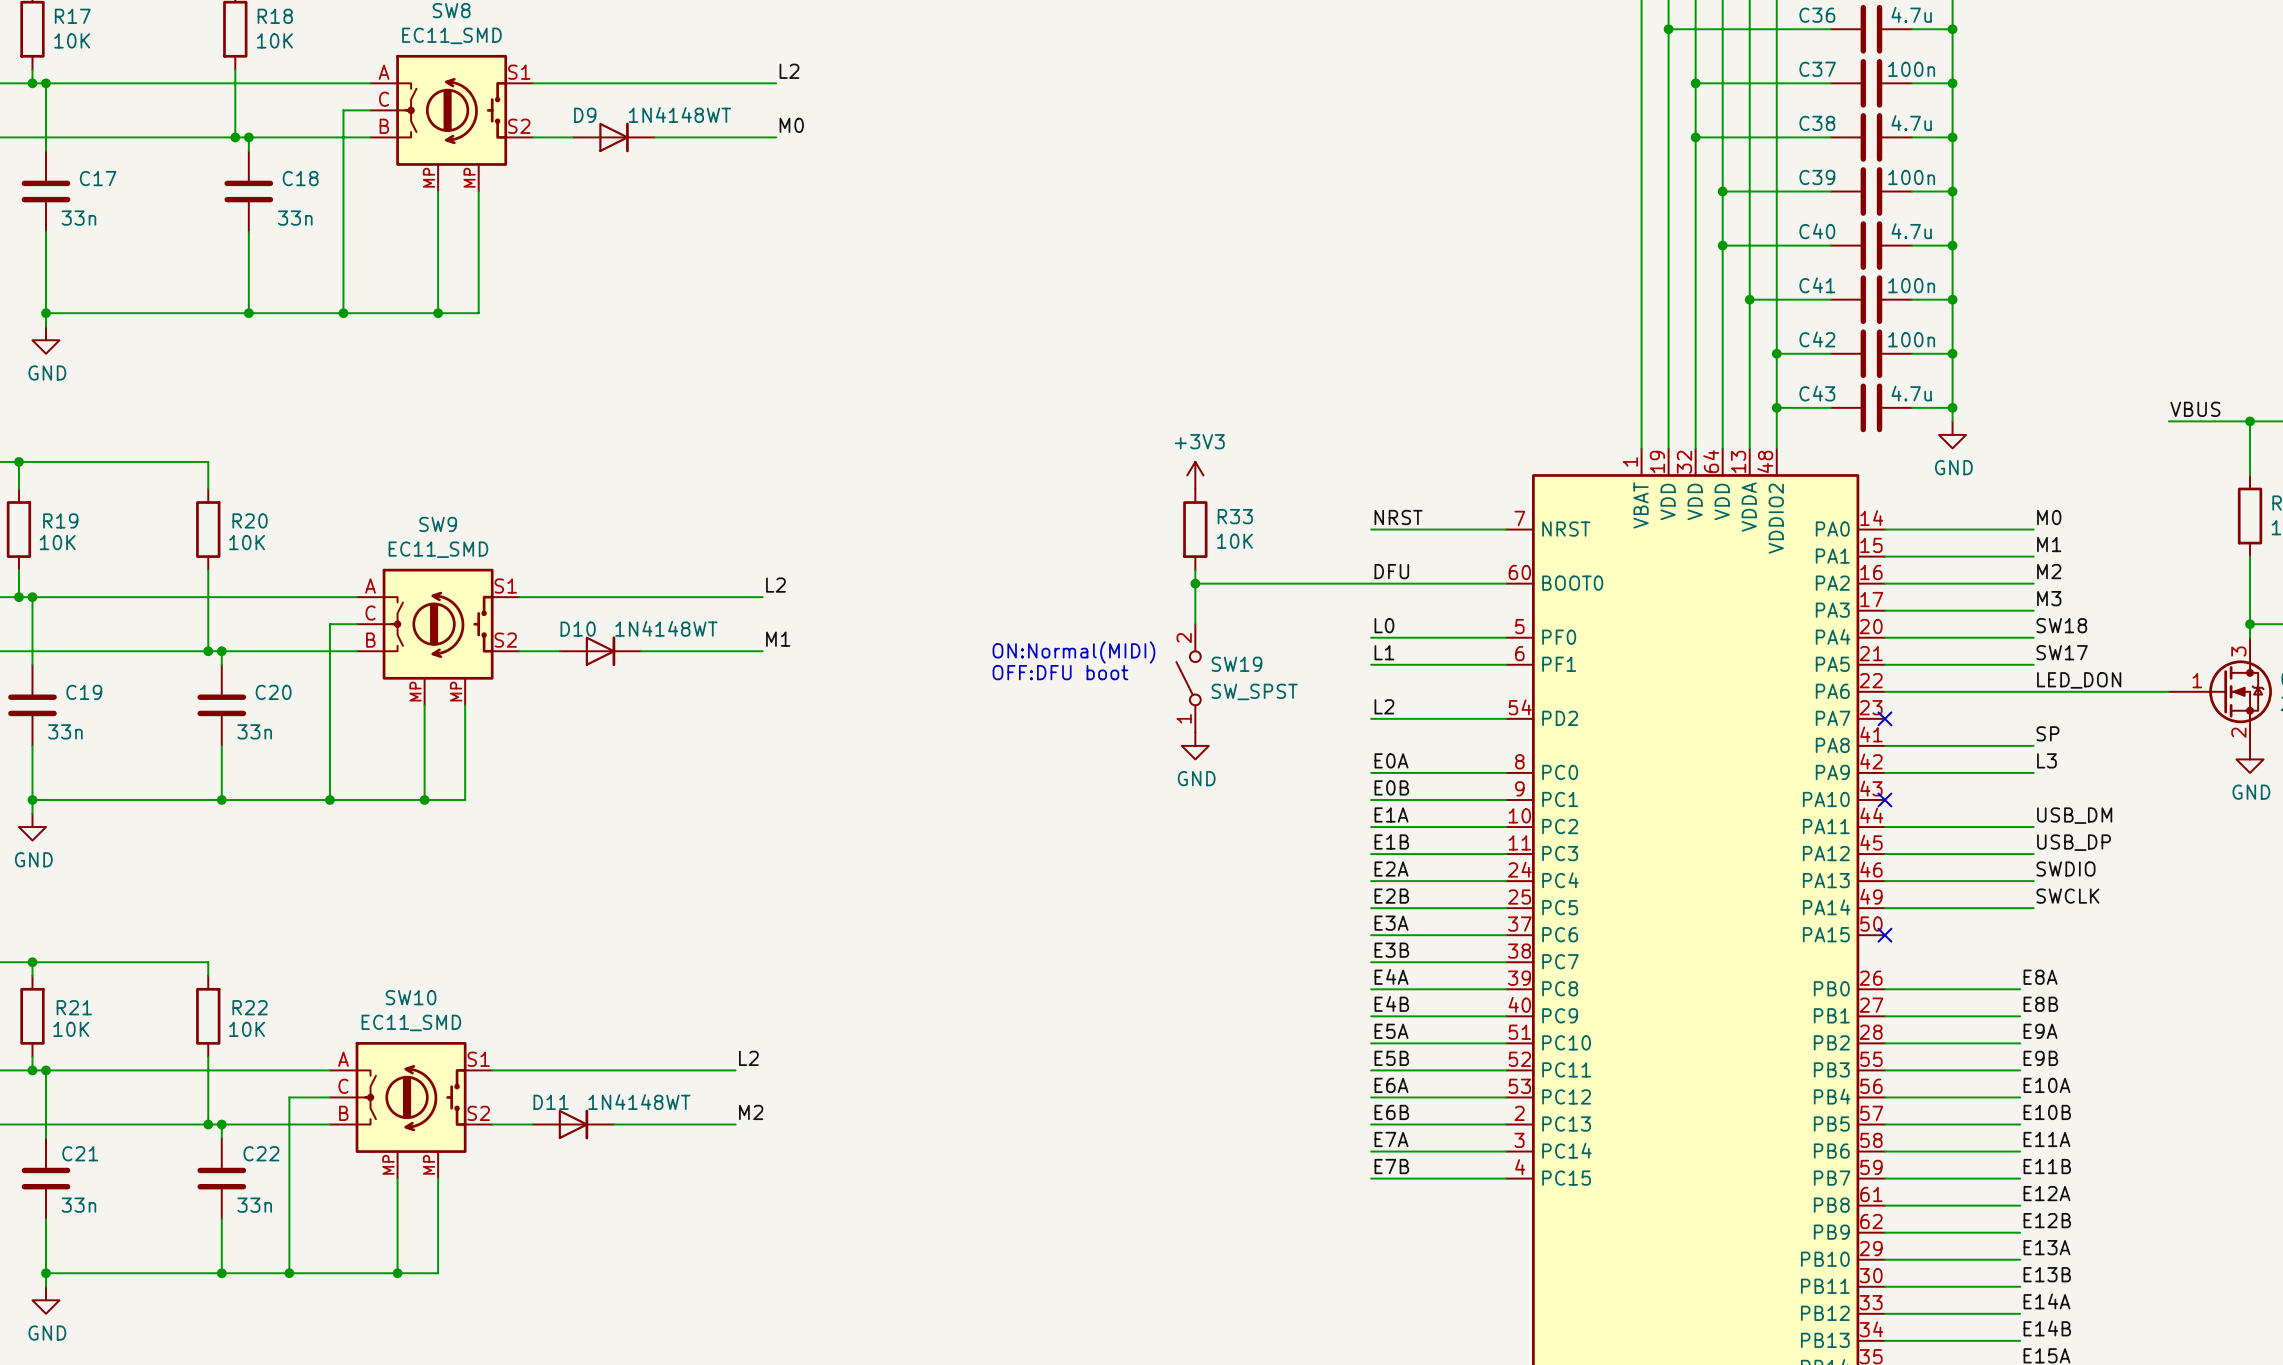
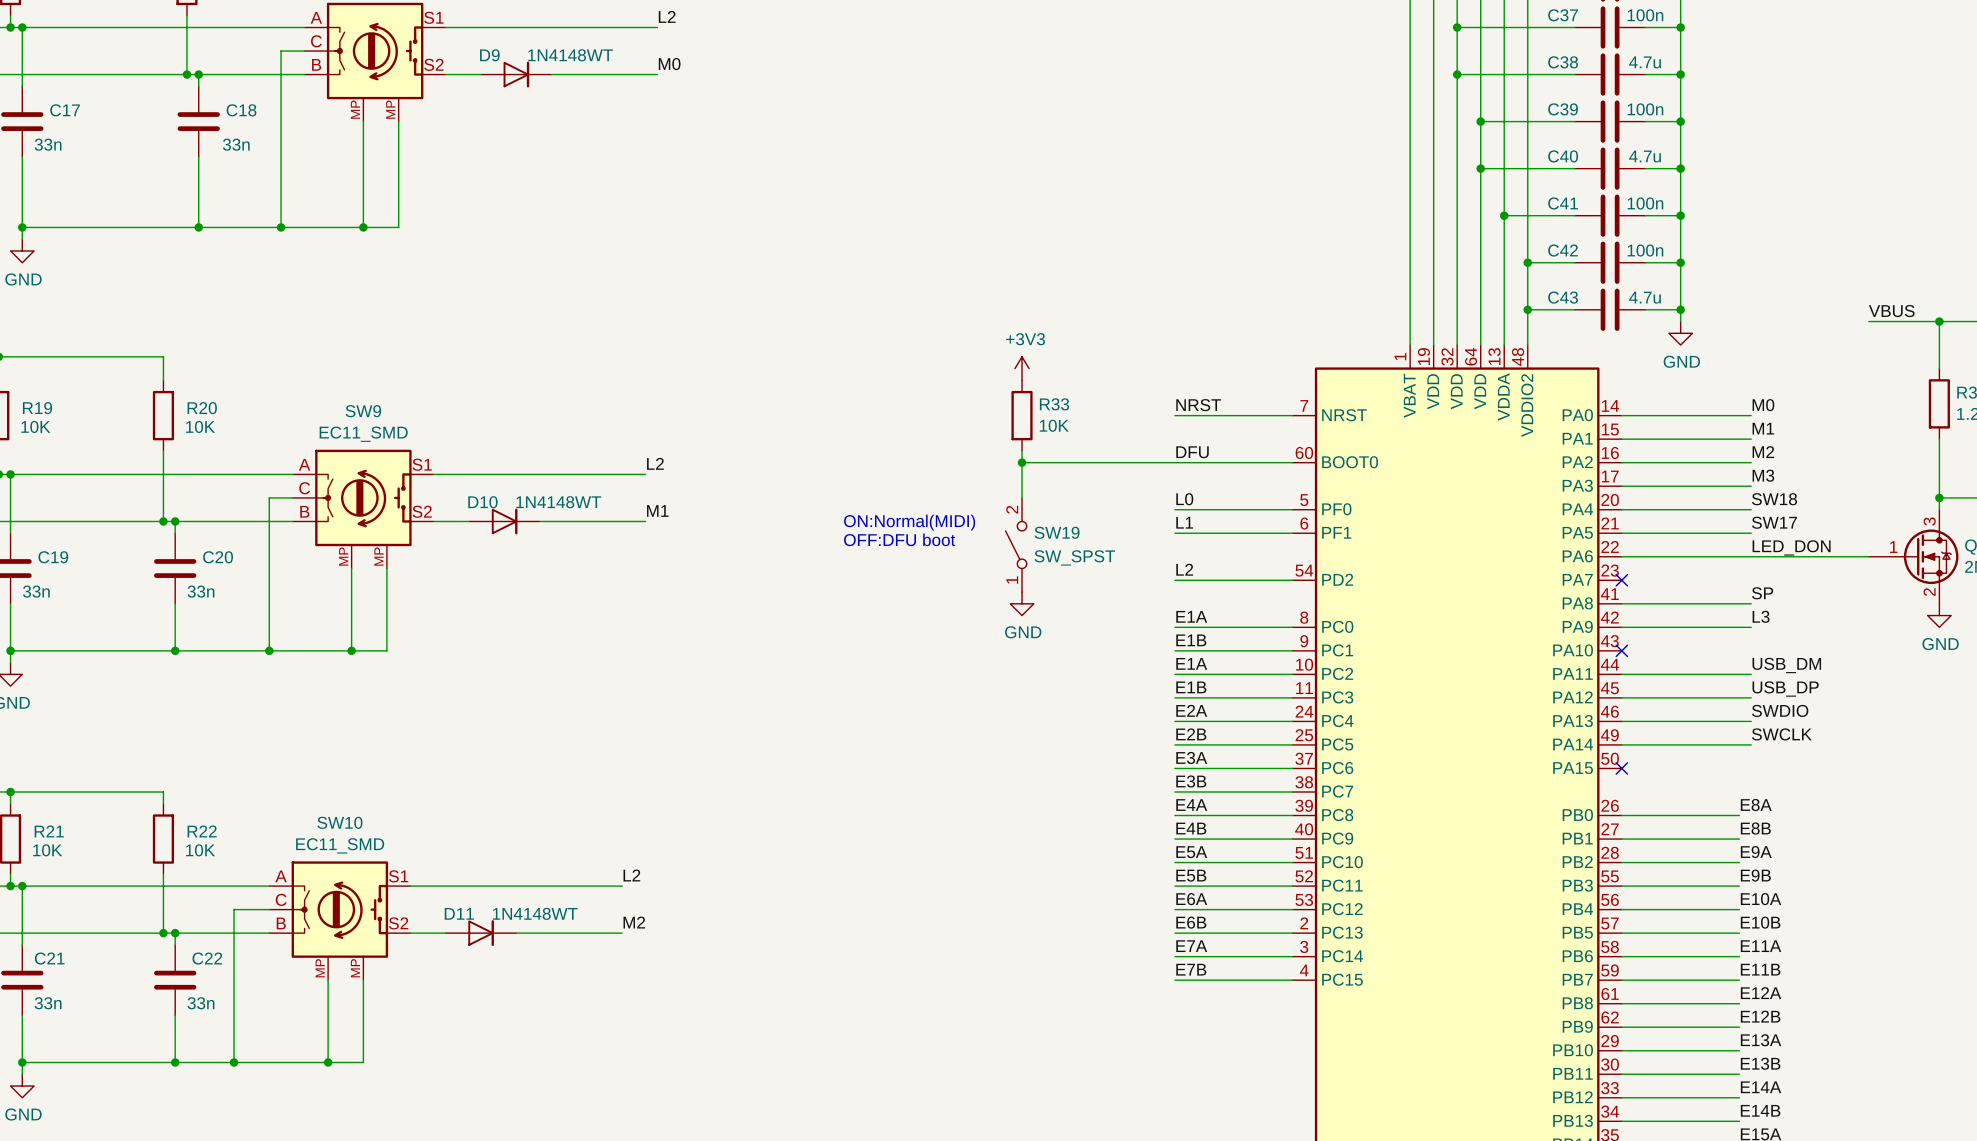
label: E0A (1391, 760) -> E1A (1191, 616)
label: E0B (1391, 787) -> E1B (1191, 640)

